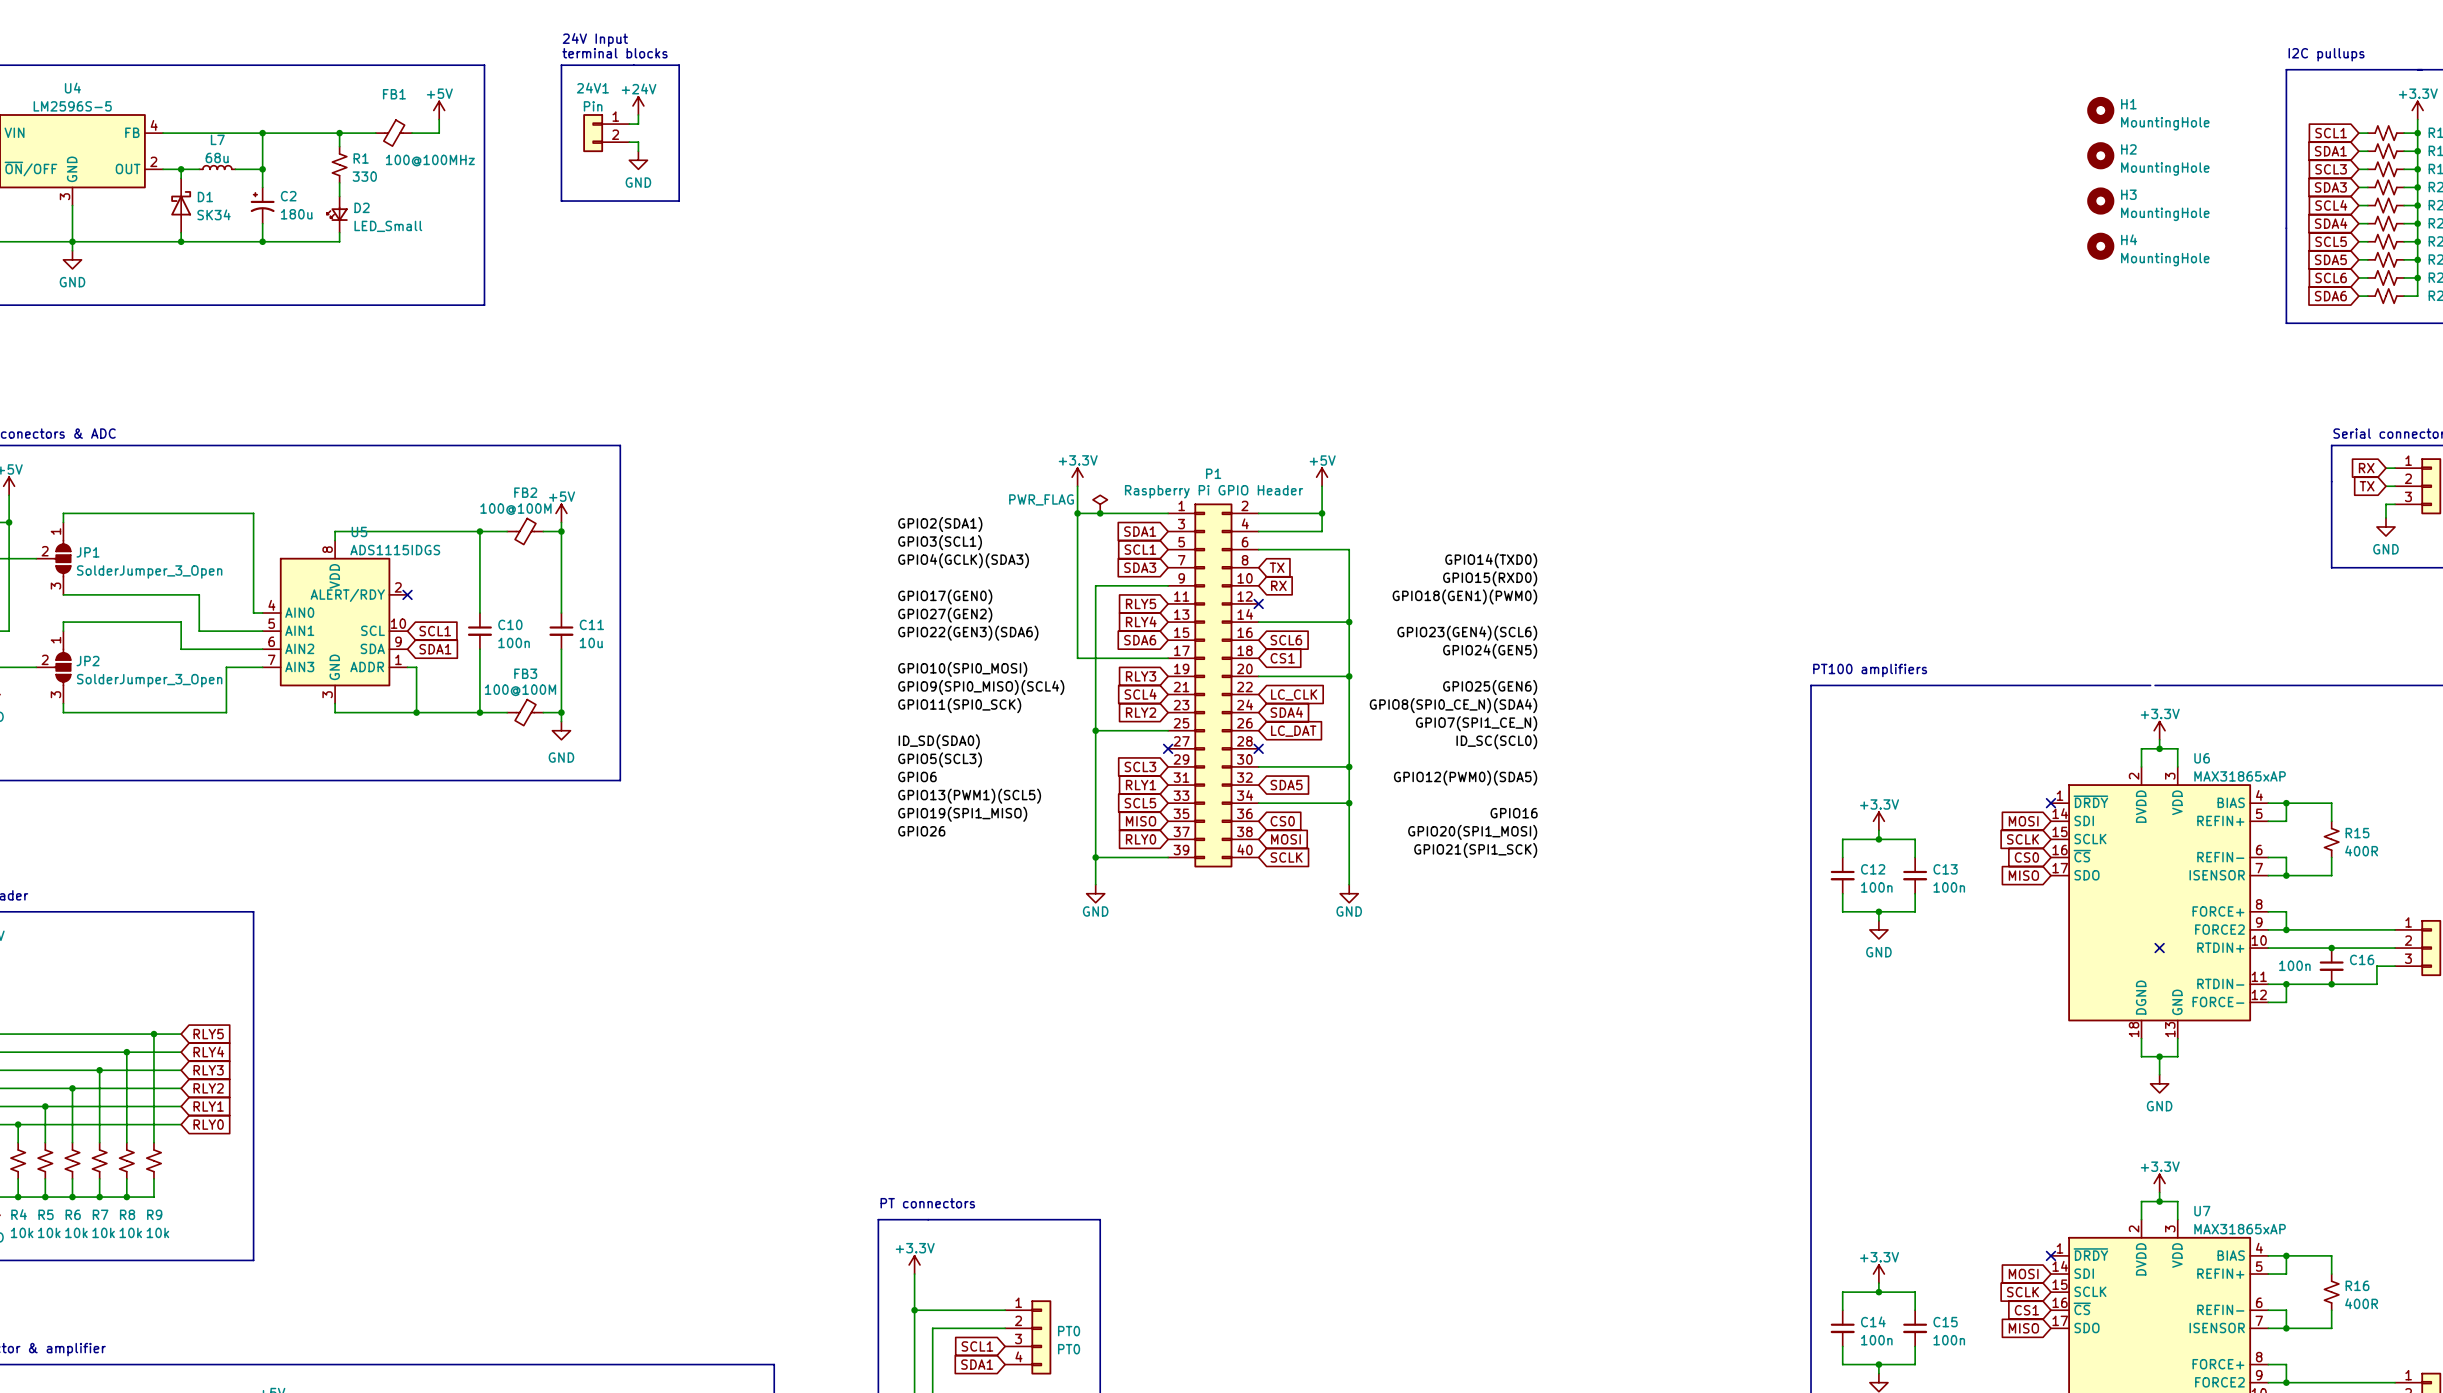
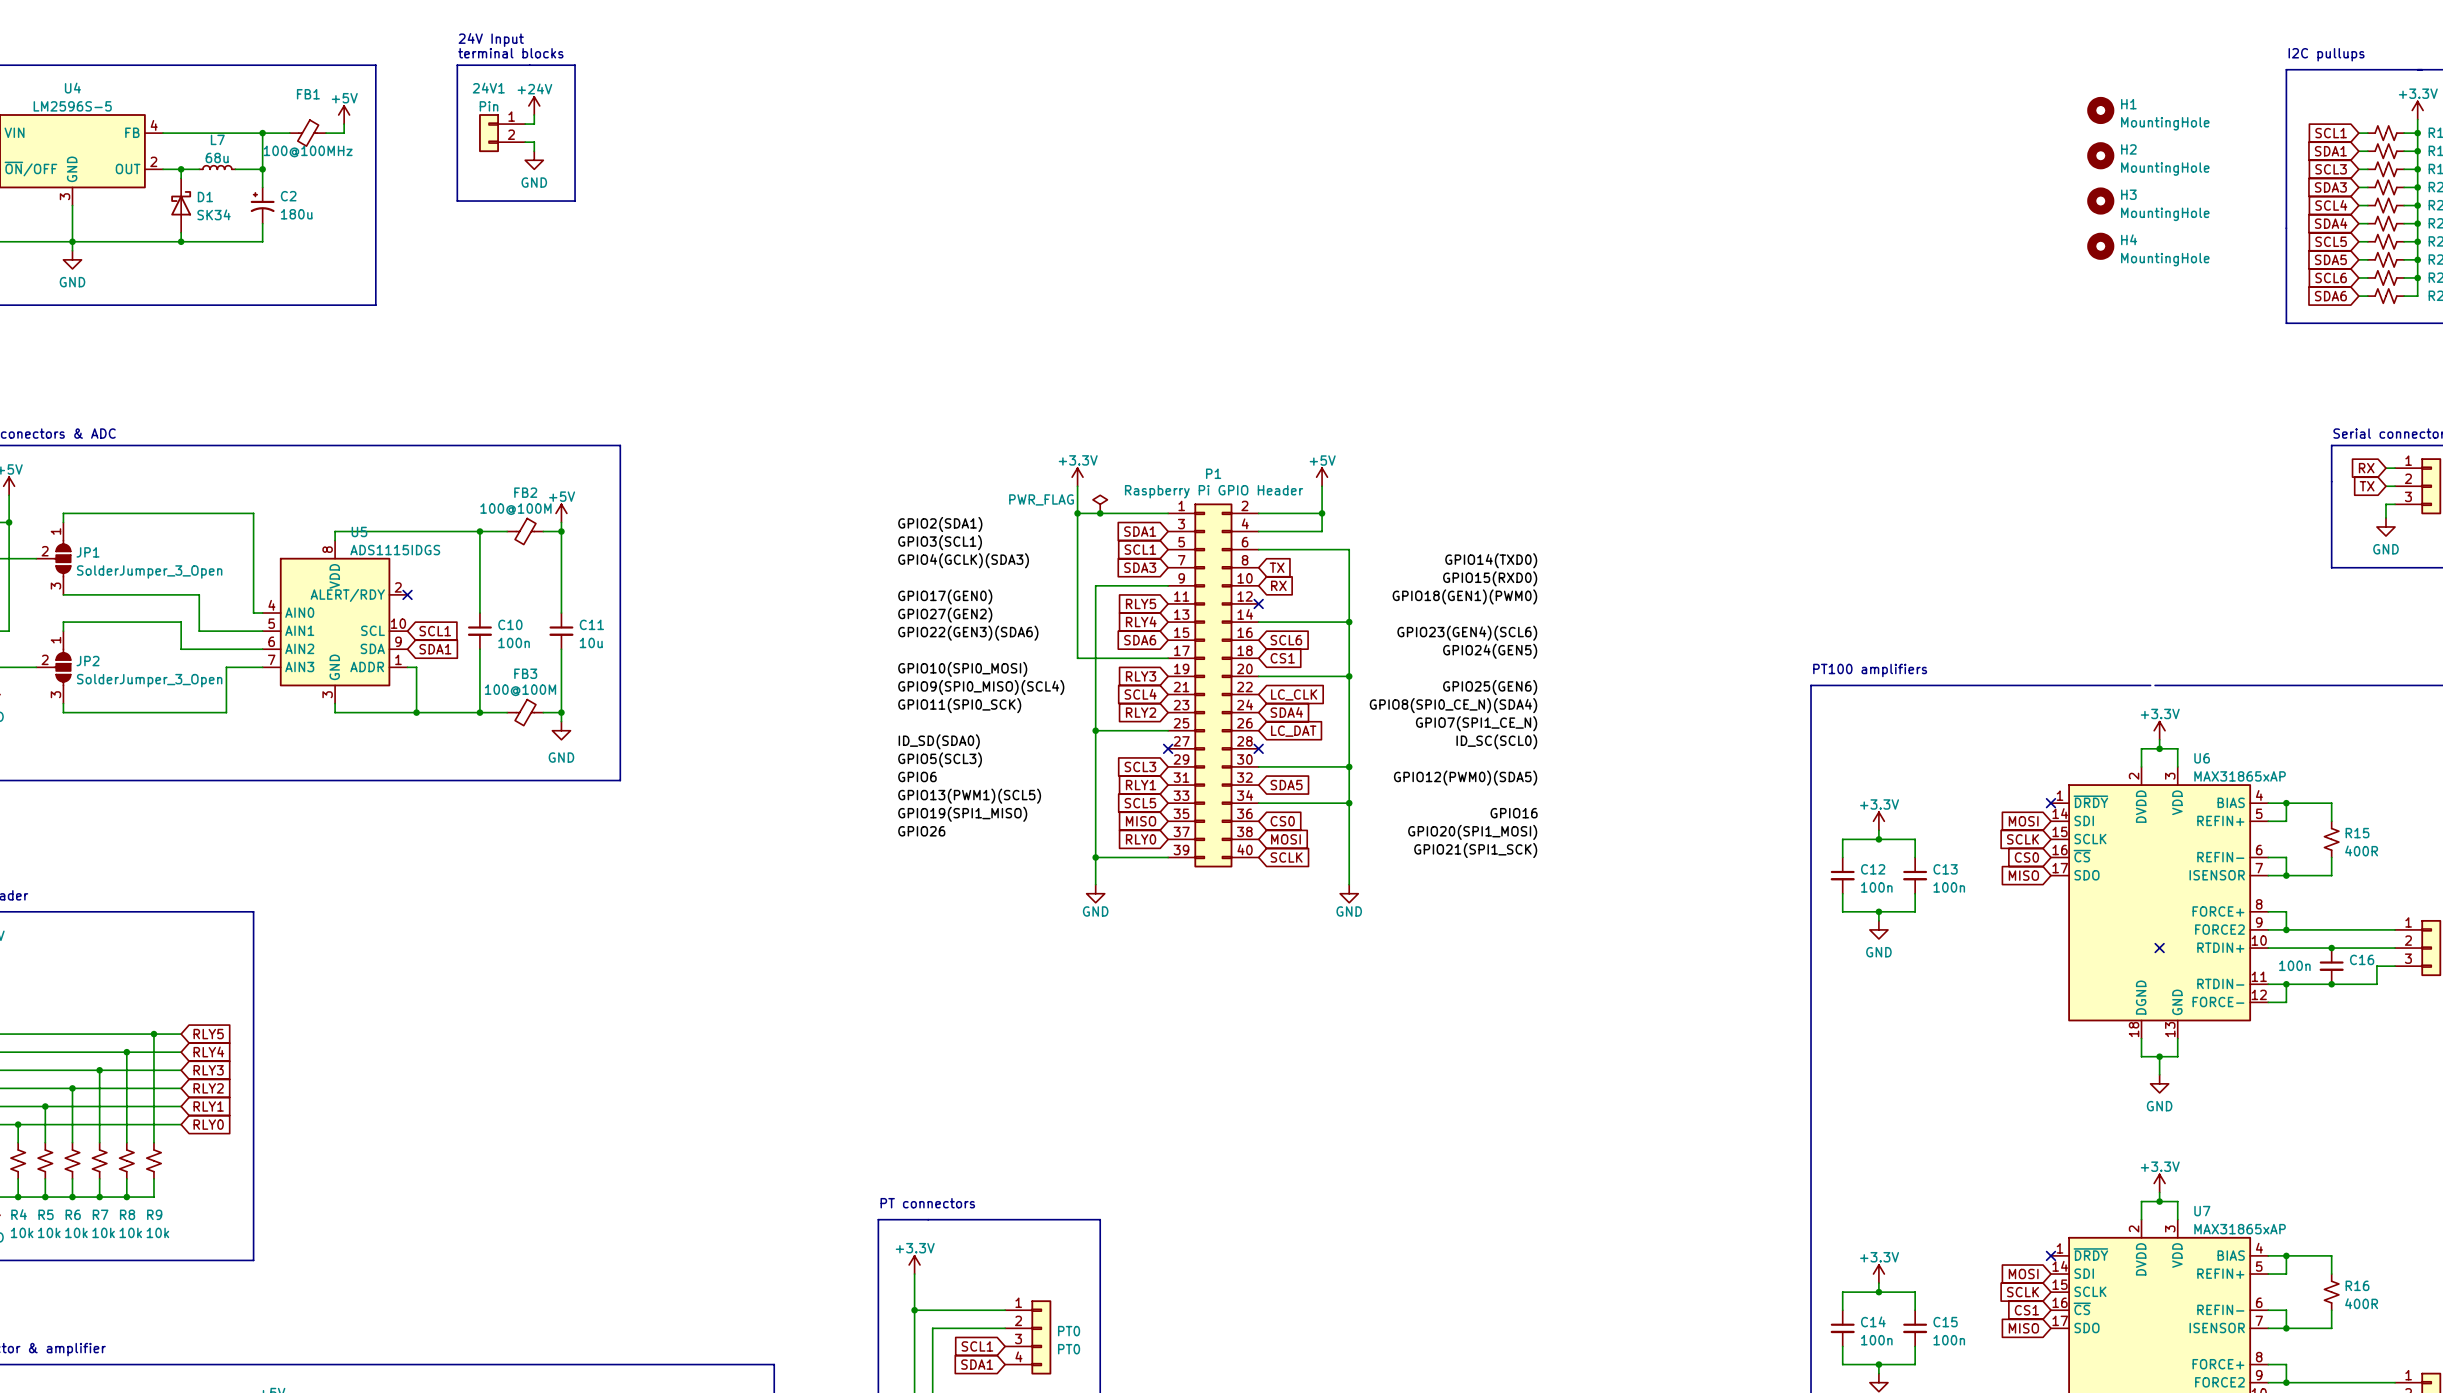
text position: 24V Input (595, 39) -> 24V Input (491, 39)
text position: terminal blocks (614, 53) -> terminal blocks (510, 53)
line: (375, 65) (457, 65) -> none
line: (484, 65) (484, 305) (375, 305) -> (375, 65) (375, 305)
line: none -> (484, 65) (561, 65)
line: (561, 65) (561, 201) -> (457, 65) (457, 201) (561, 201)
line: (575, 65) (679, 65) (679, 201) (575, 201) -> (575, 65) (575, 201)
power symbol position: +24V (638, 105) -> +24V (534, 105)
power symbol position: +5V (439, 110) -> +5V (344, 115)
wire: (638, 115) (638, 124) (629, 124) -> (534, 115) (534, 124) (525, 124)
wire: (439, 119) (439, 133) (412, 133) -> none
wire: (339, 133) (339, 146) -> none
junction: (339, 133) -> none
wire: (344, 133) (375, 133) -> (344, 133) (344, 124)
FB1 position: (393, 133) -> (307, 133)
24V1 position: (606, 133) -> (502, 133)
wire: (629, 142) (638, 142) (638, 151) -> (525, 142) (534, 142) (534, 151)
FB1 value position: 100@100MHz (430, 160) -> 100@100MHz (308, 151)
power symbol position: GND (638, 160) -> GND (534, 160)
R1: 330 (339, 164) -> none
wire: (339, 182) (339, 196) -> none
D2: LED_Small (337, 214) -> none
wire: (339, 232) (339, 241) (262, 241) -> none
junction: (262, 241) -> none

